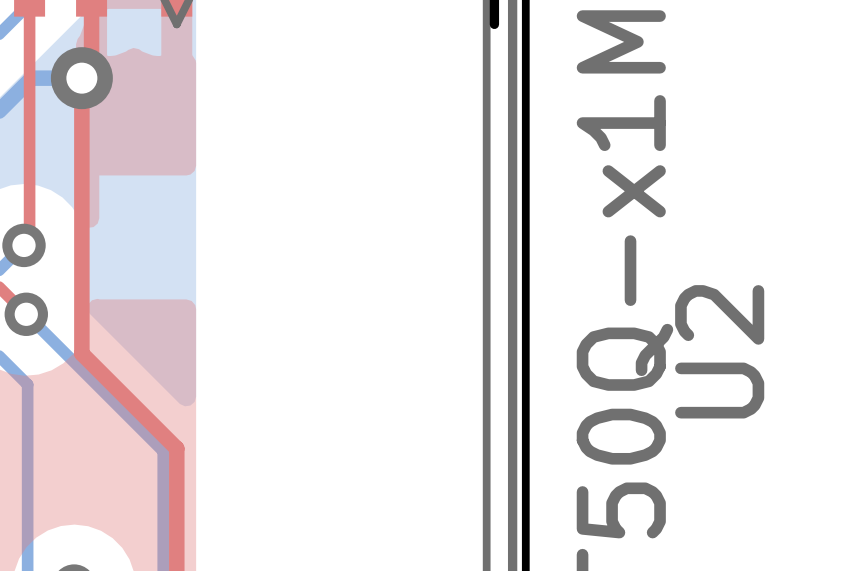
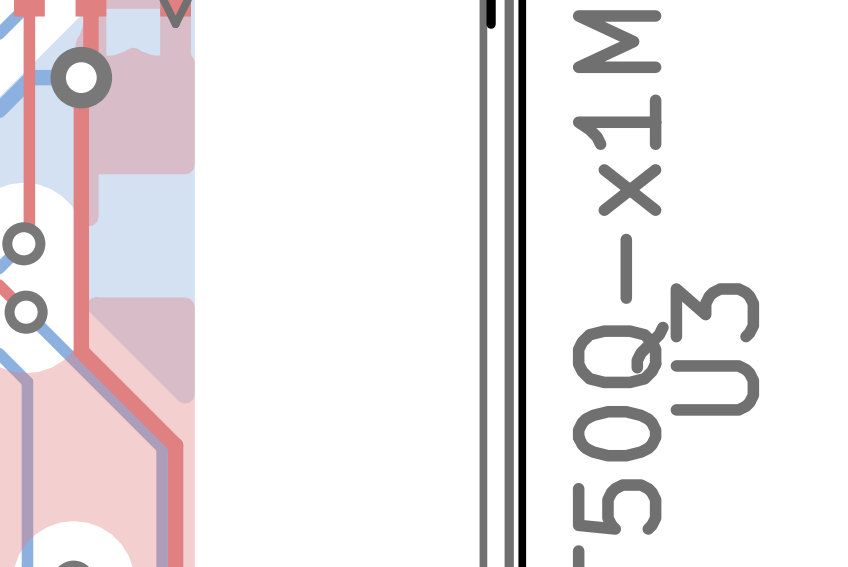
U2 name: U2 (719, 351) -> U3 (714, 349)

